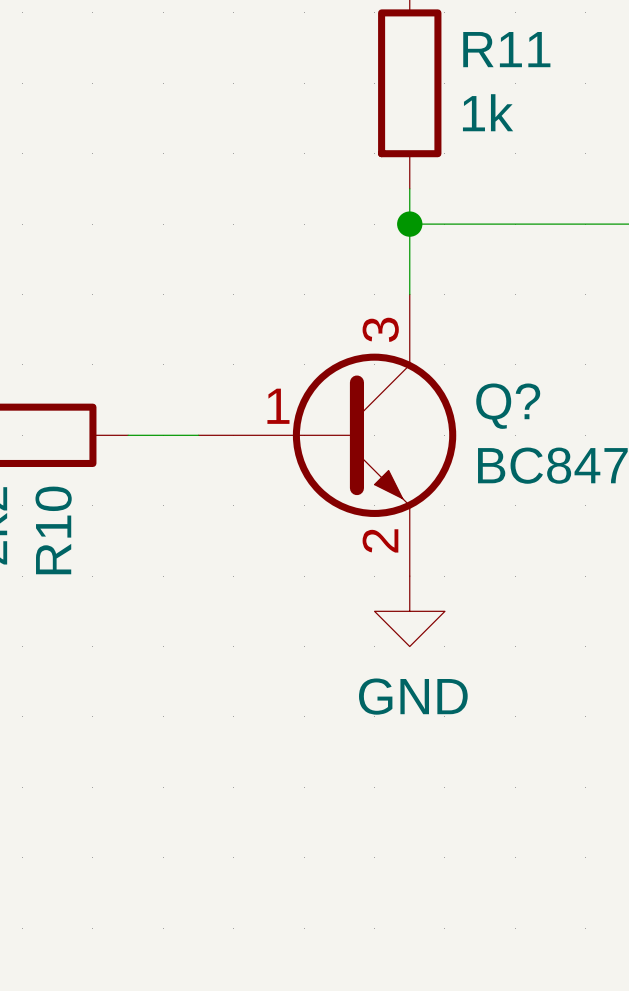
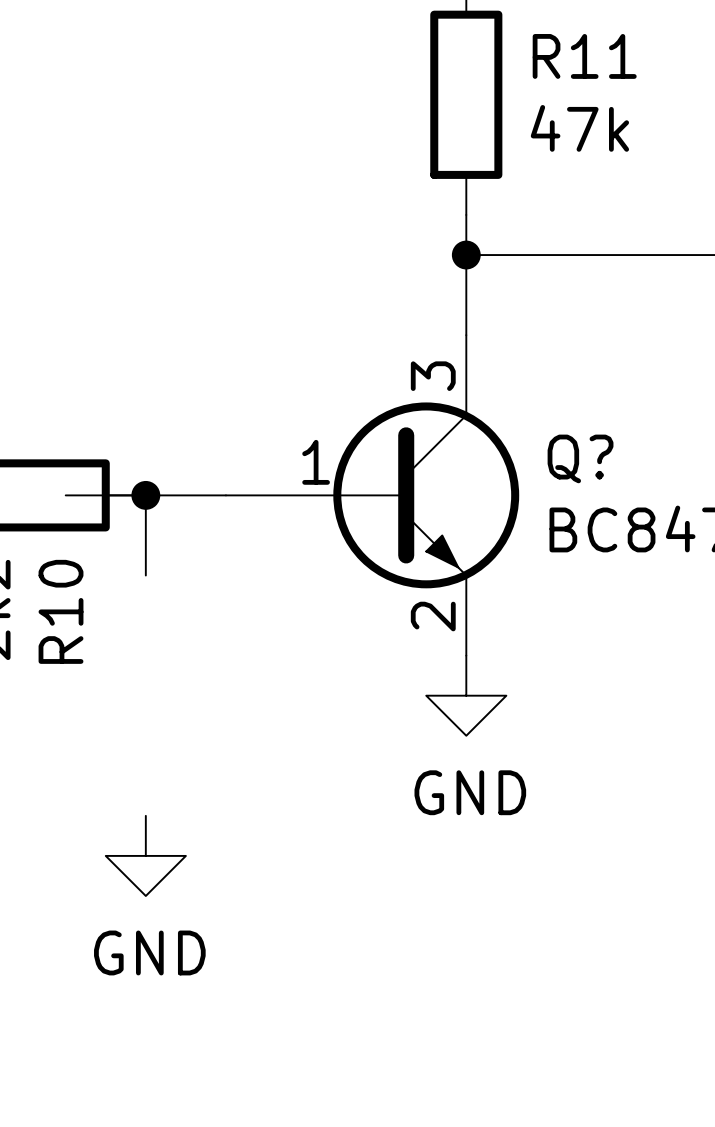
R11 value: 1k (488, 112) -> 47k (579, 128)
wire: none -> (65, 495) (145, 495) (145, 575)
junction: none -> (145, 495)
power symbol: none -> GND (145, 855)

